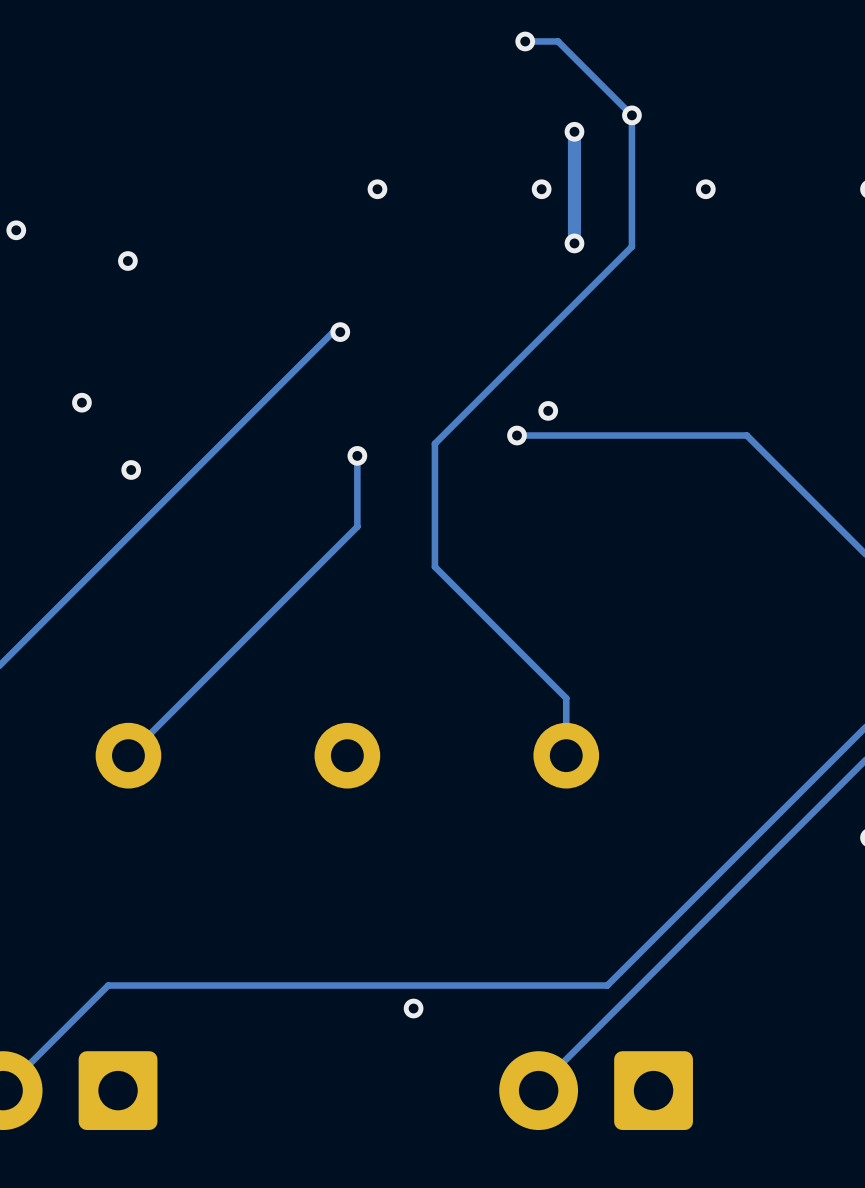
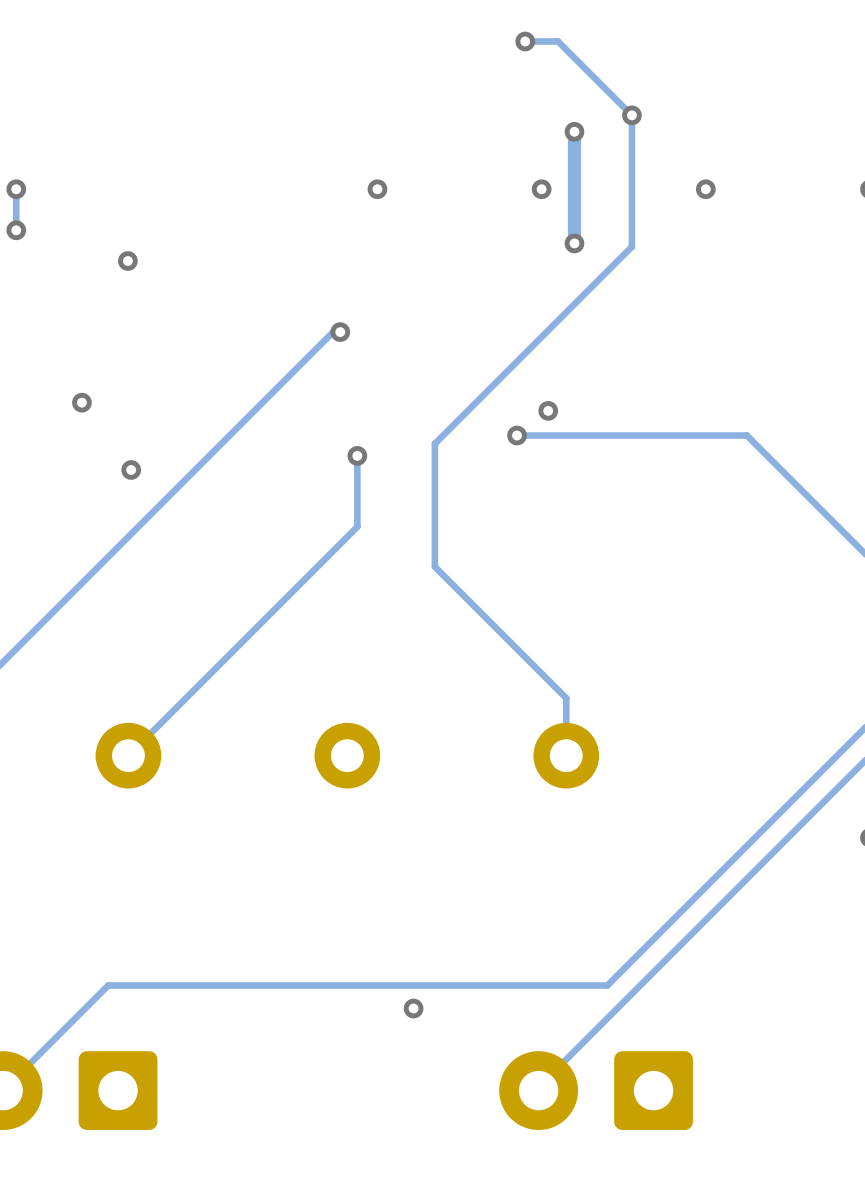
track: none -> (16, 189) (16, 230)
via: none -> (16, 189)

